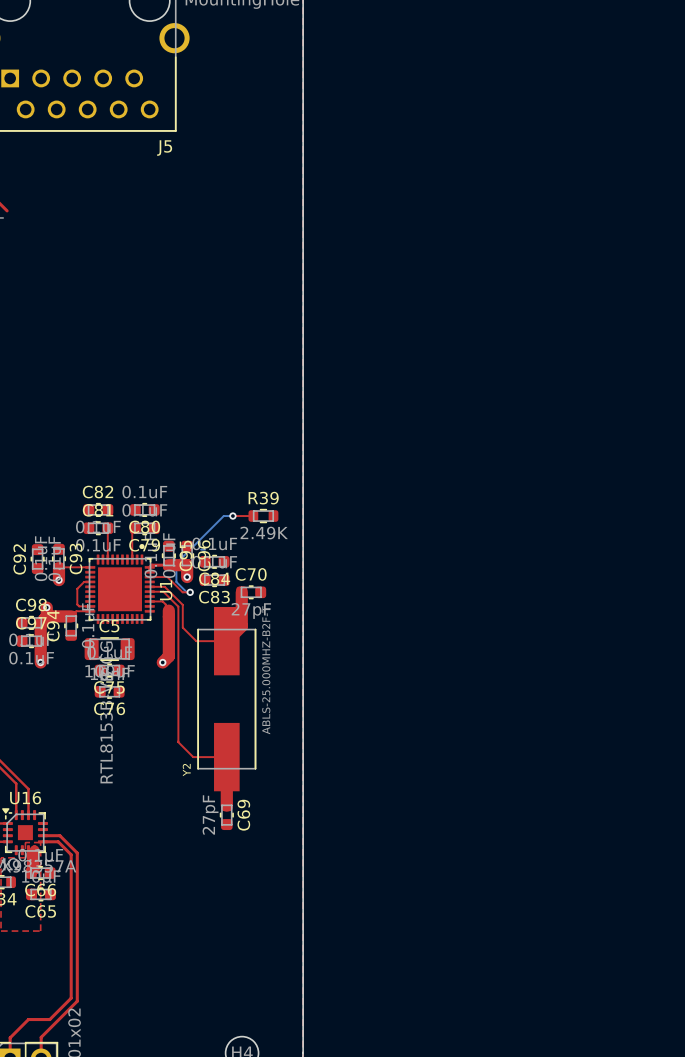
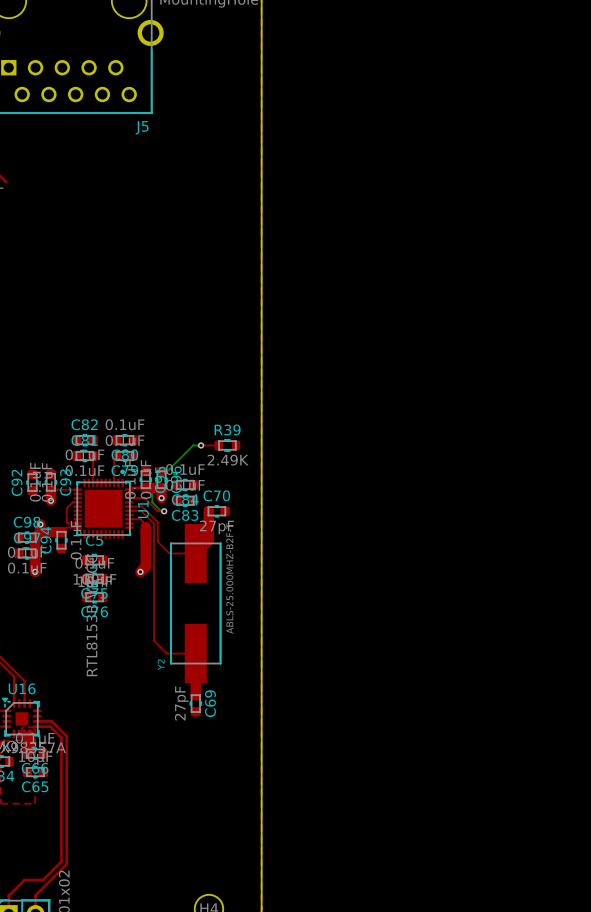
C5 footprint: [84, 637, 135, 661] -> [81, 554, 108, 567]

